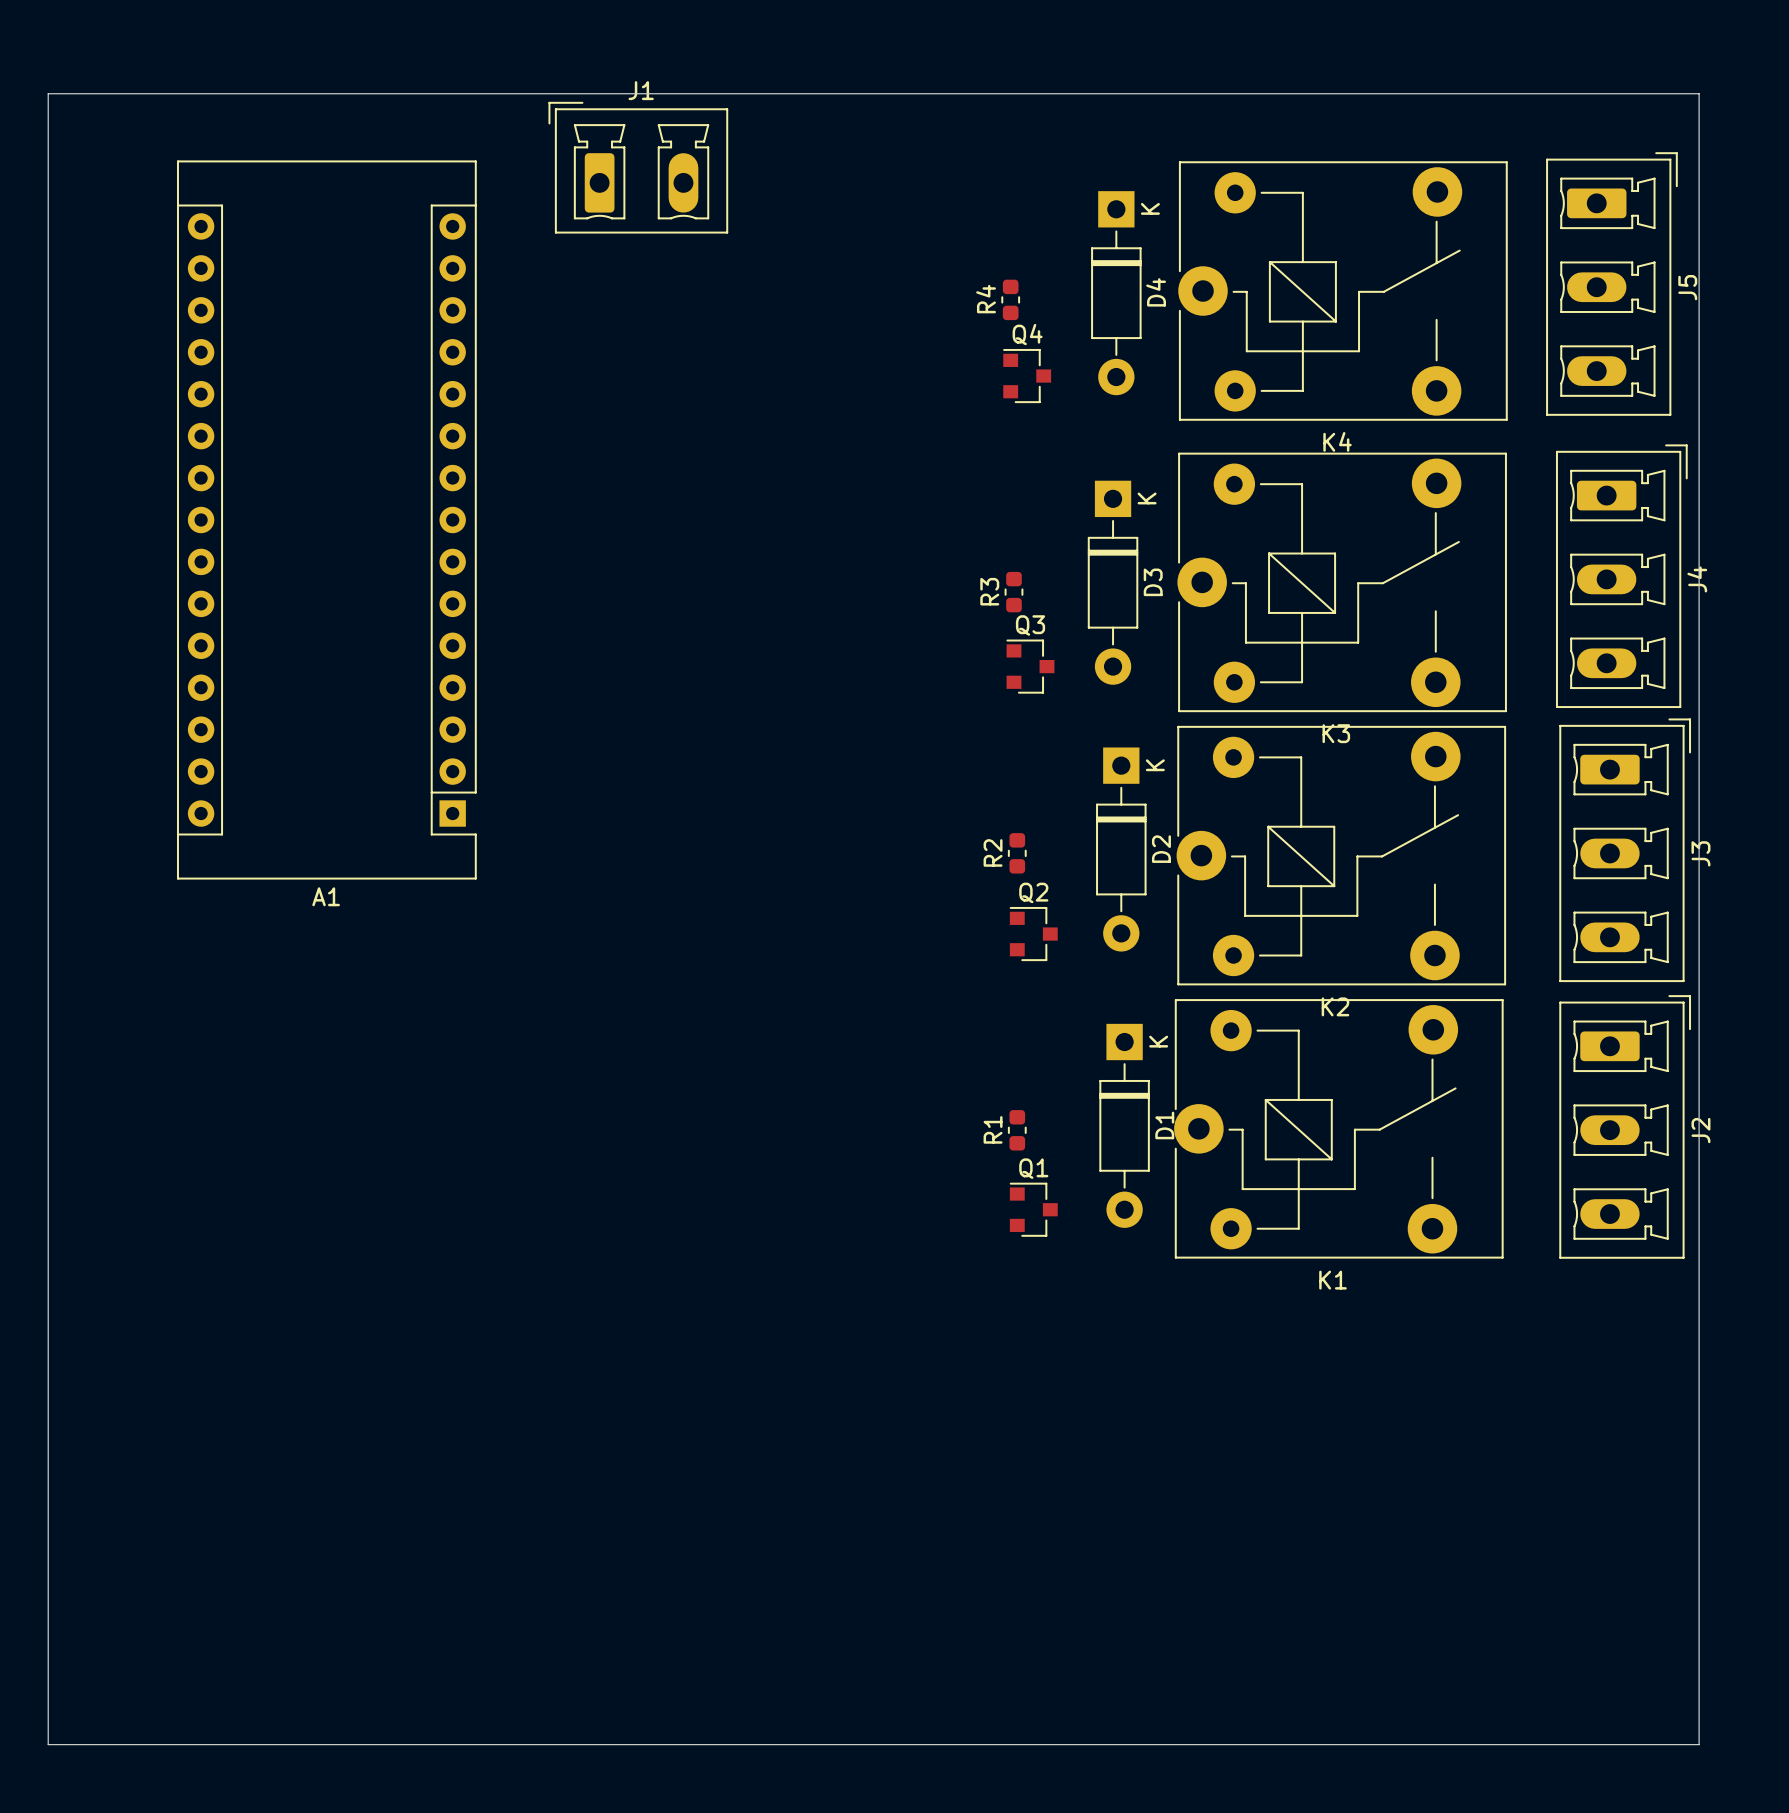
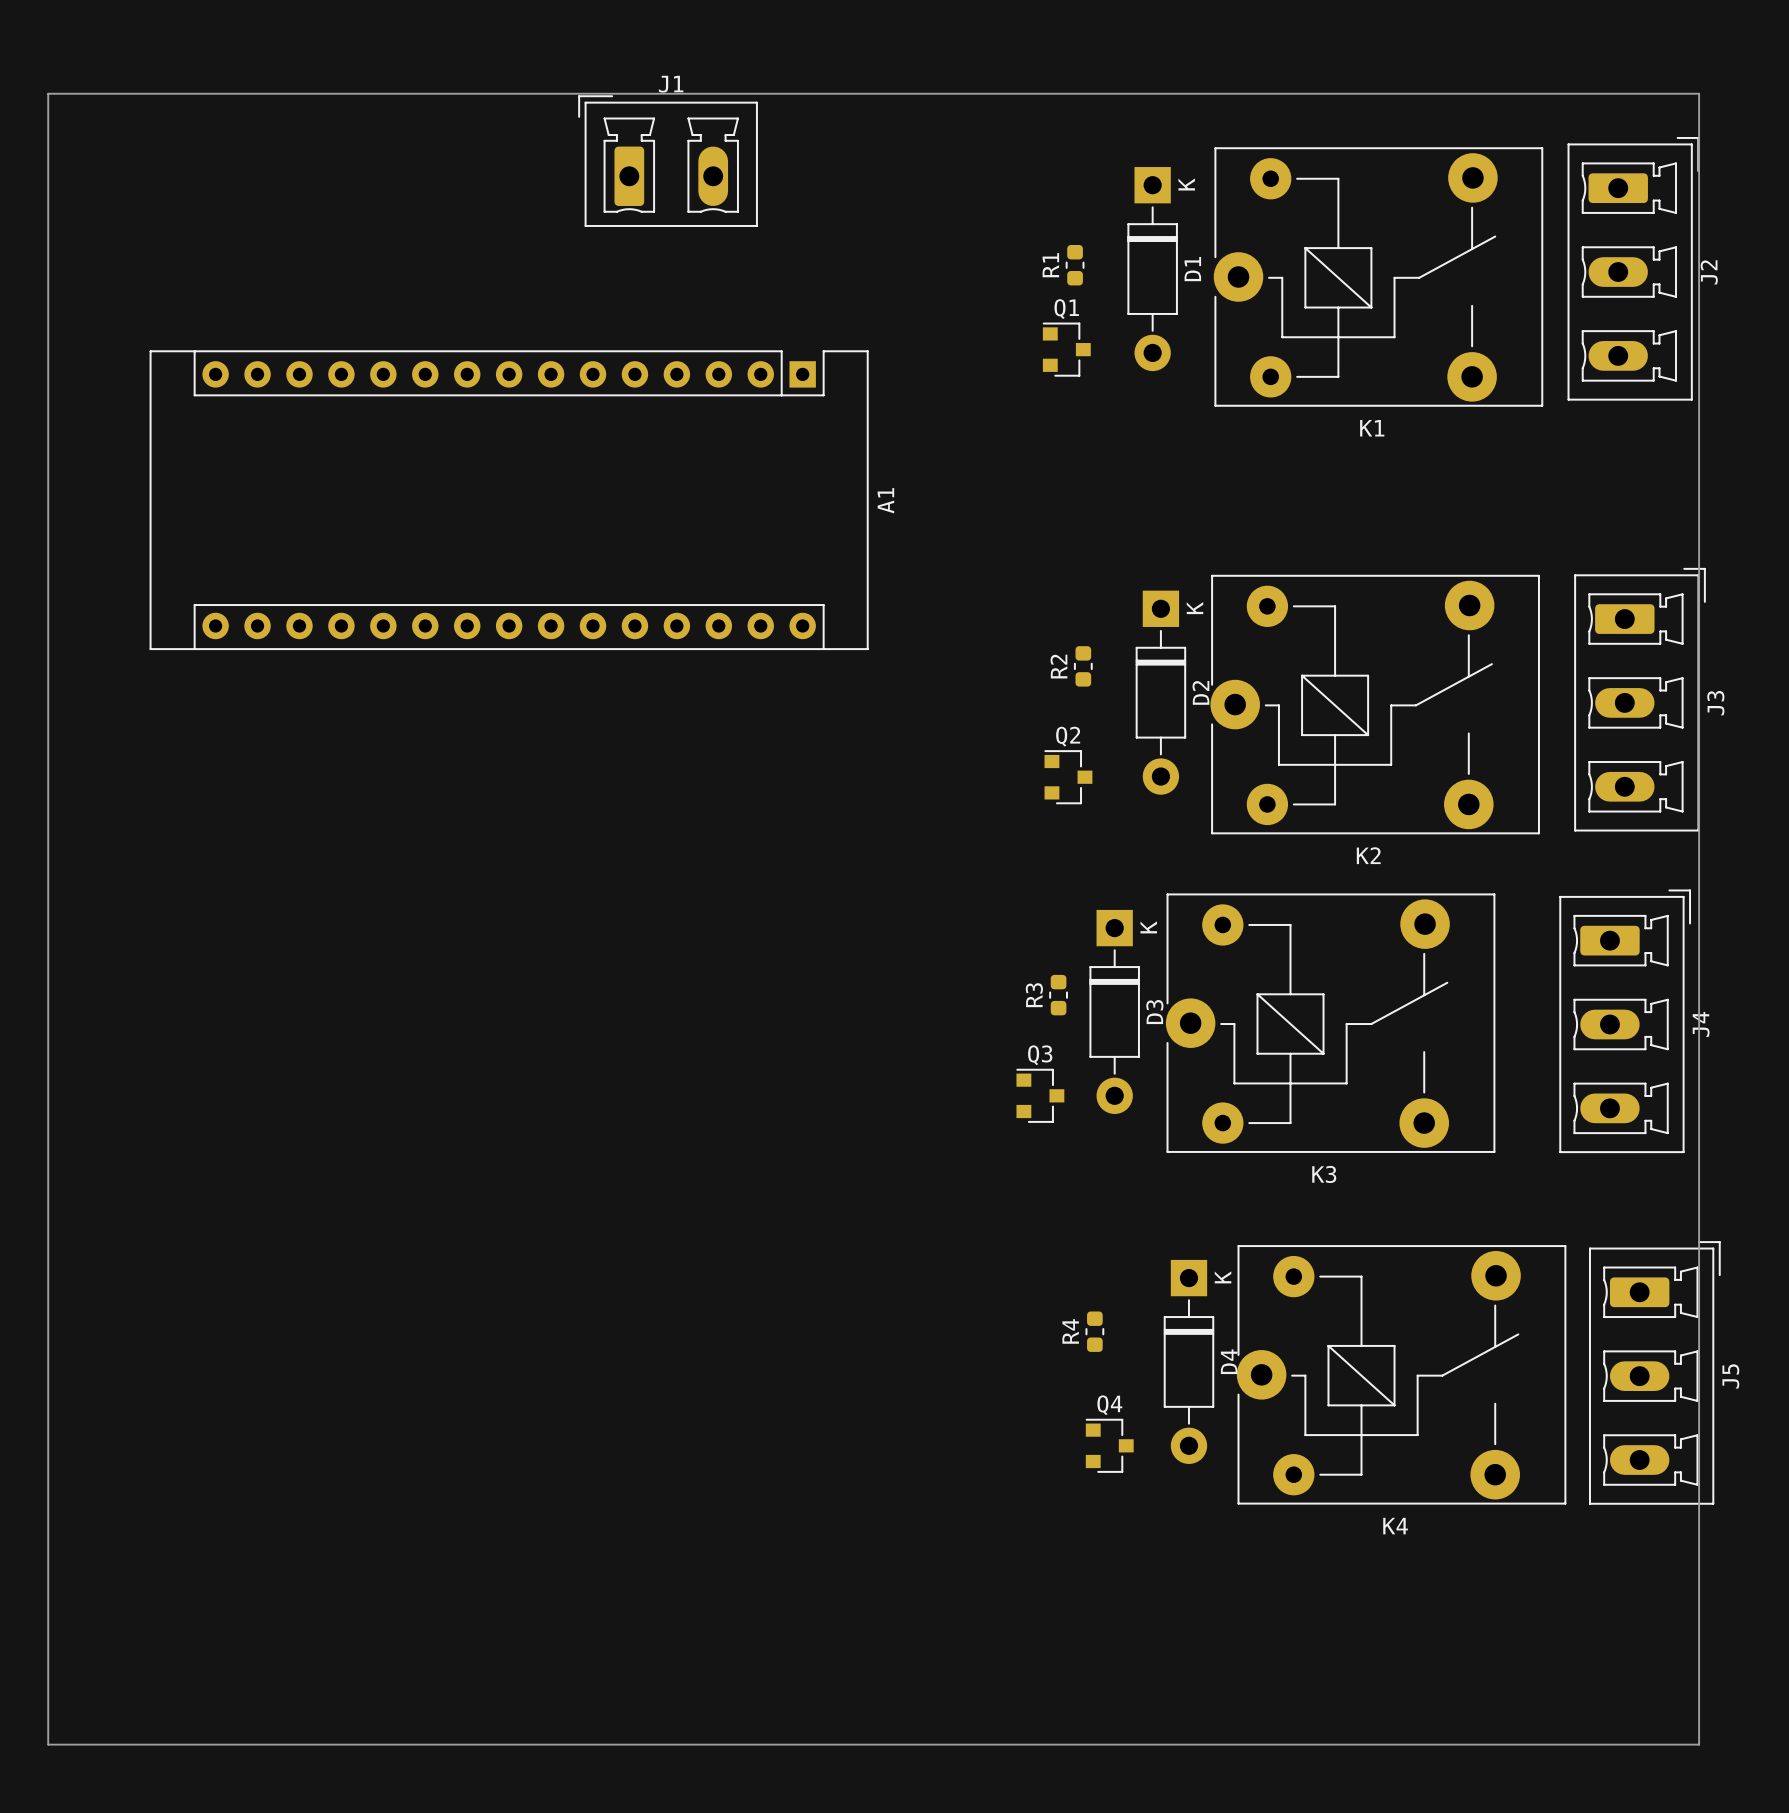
J1 position: (638, 167) -> (668, 161)
J5 position: (1611, 284) -> (1654, 1372)
K4 position: (1343, 291) -> (1401, 1374)
D4 position: (1116, 293) -> (1188, 1361)
R4 position: (1010, 299) -> (1094, 1331)
Q4 position: (1027, 376) -> (1109, 1445)
A1 rotation: 0° (326, 519) -> 90° counterclockwise (509, 500)
J4 position: (1621, 576) -> (1625, 1021)
D3 position: (1113, 582) -> (1114, 1011)
K3 position: (1342, 582) -> (1330, 1023)
R3 position: (1013, 592) -> (1058, 995)
Q3 position: (1030, 666) -> (1040, 1095)
D2 position: (1121, 849) -> (1160, 692)
J3 position: (1625, 850) -> (1640, 699)
R2 position: (1017, 853) -> (1083, 666)
K2 position: (1341, 855) -> (1375, 704)
Q2 position: (1033, 934) -> (1068, 777)
D1 position: (1124, 1125) -> (1152, 269)
J2 position: (1625, 1126) -> (1633, 268)
K1 position: (1338, 1128) -> (1378, 276)
R1 position: (1017, 1130) -> (1075, 265)
Q1 position: (1033, 1209) -> (1066, 349)

